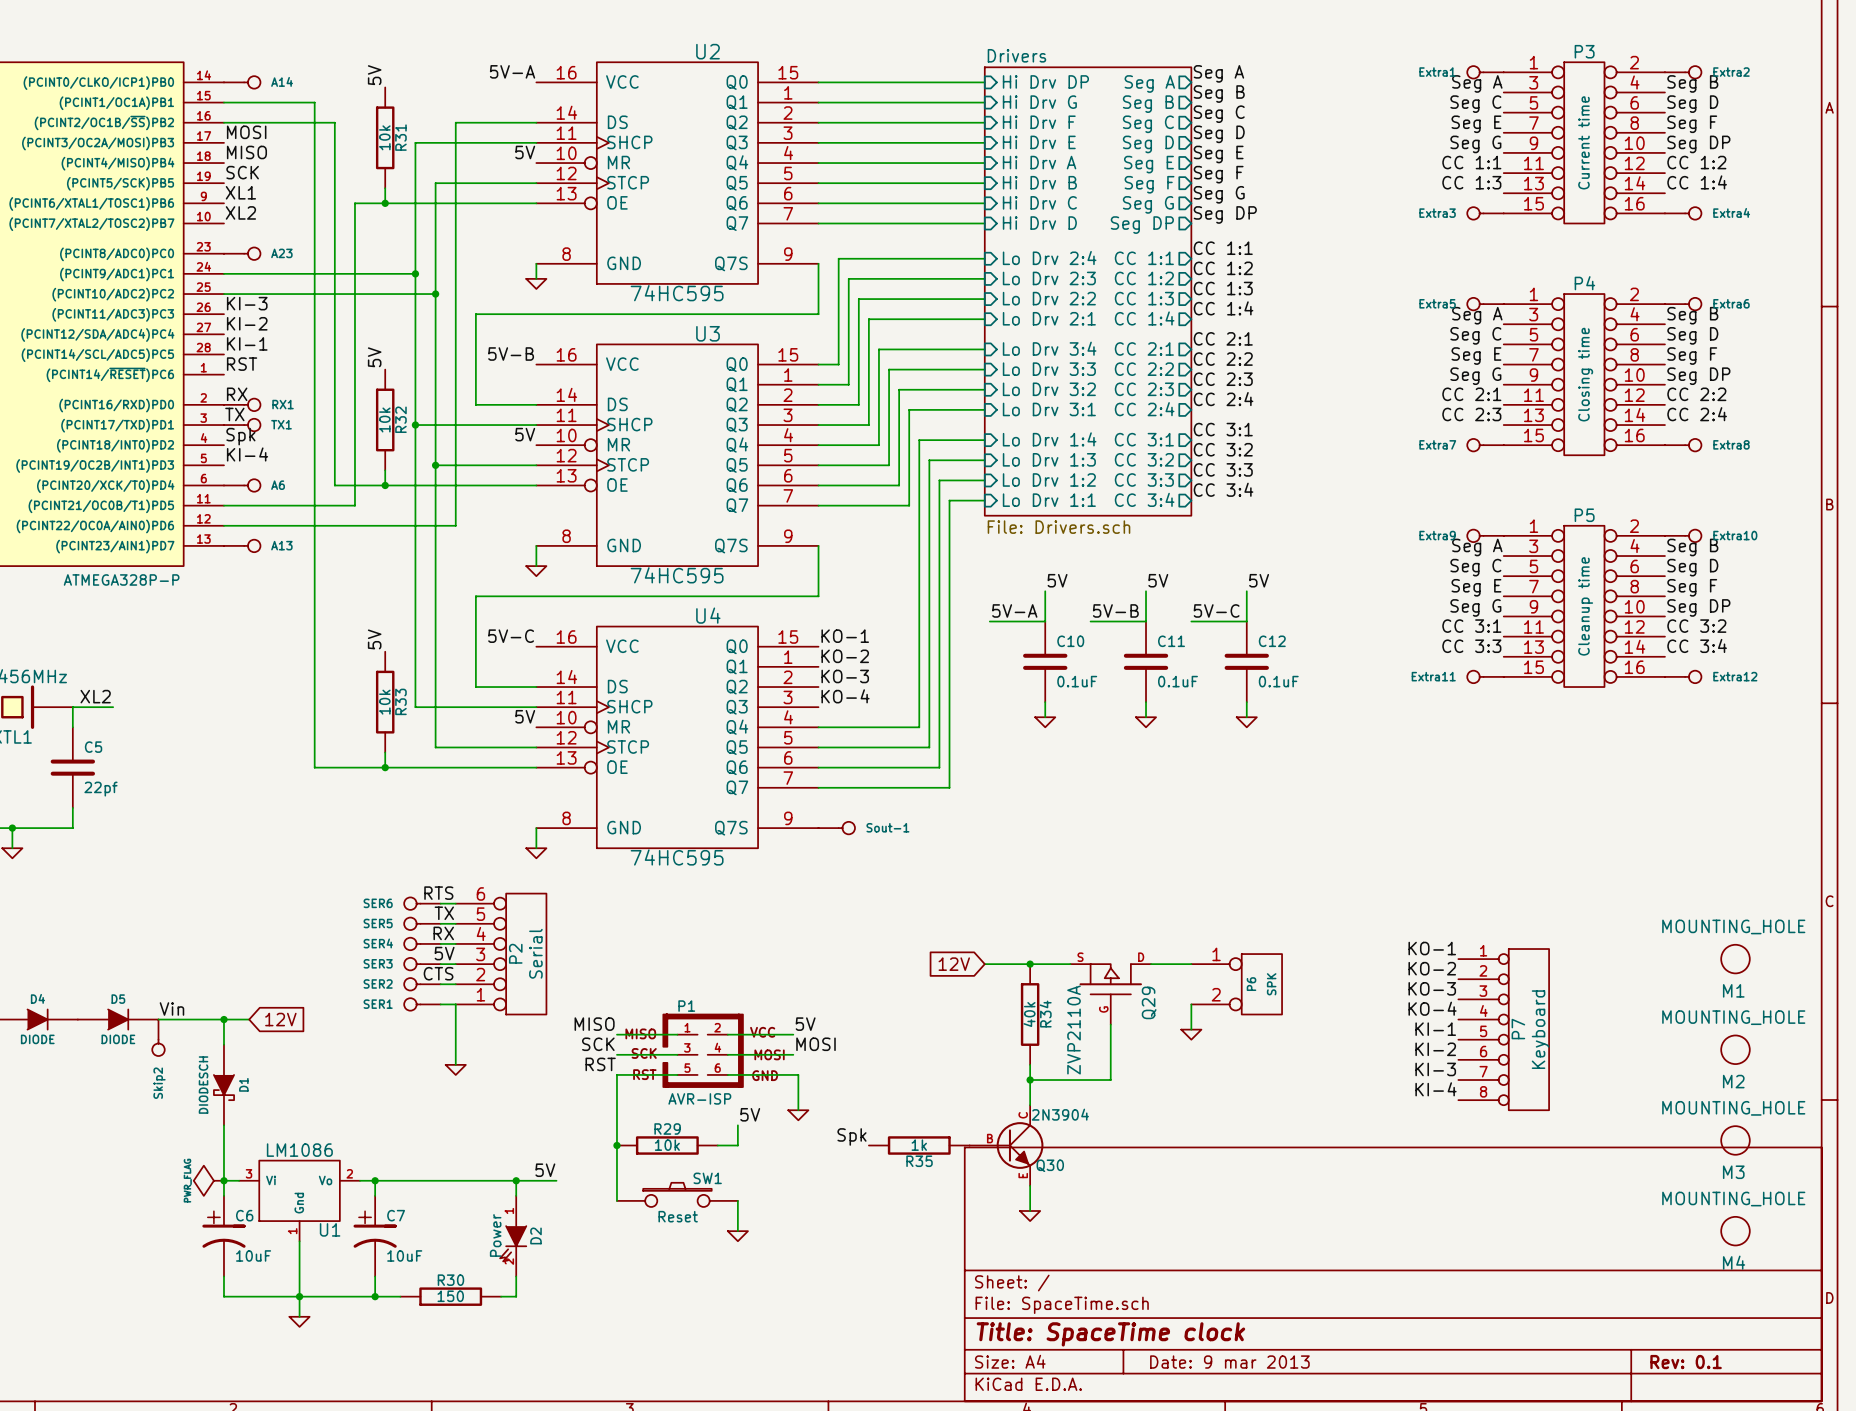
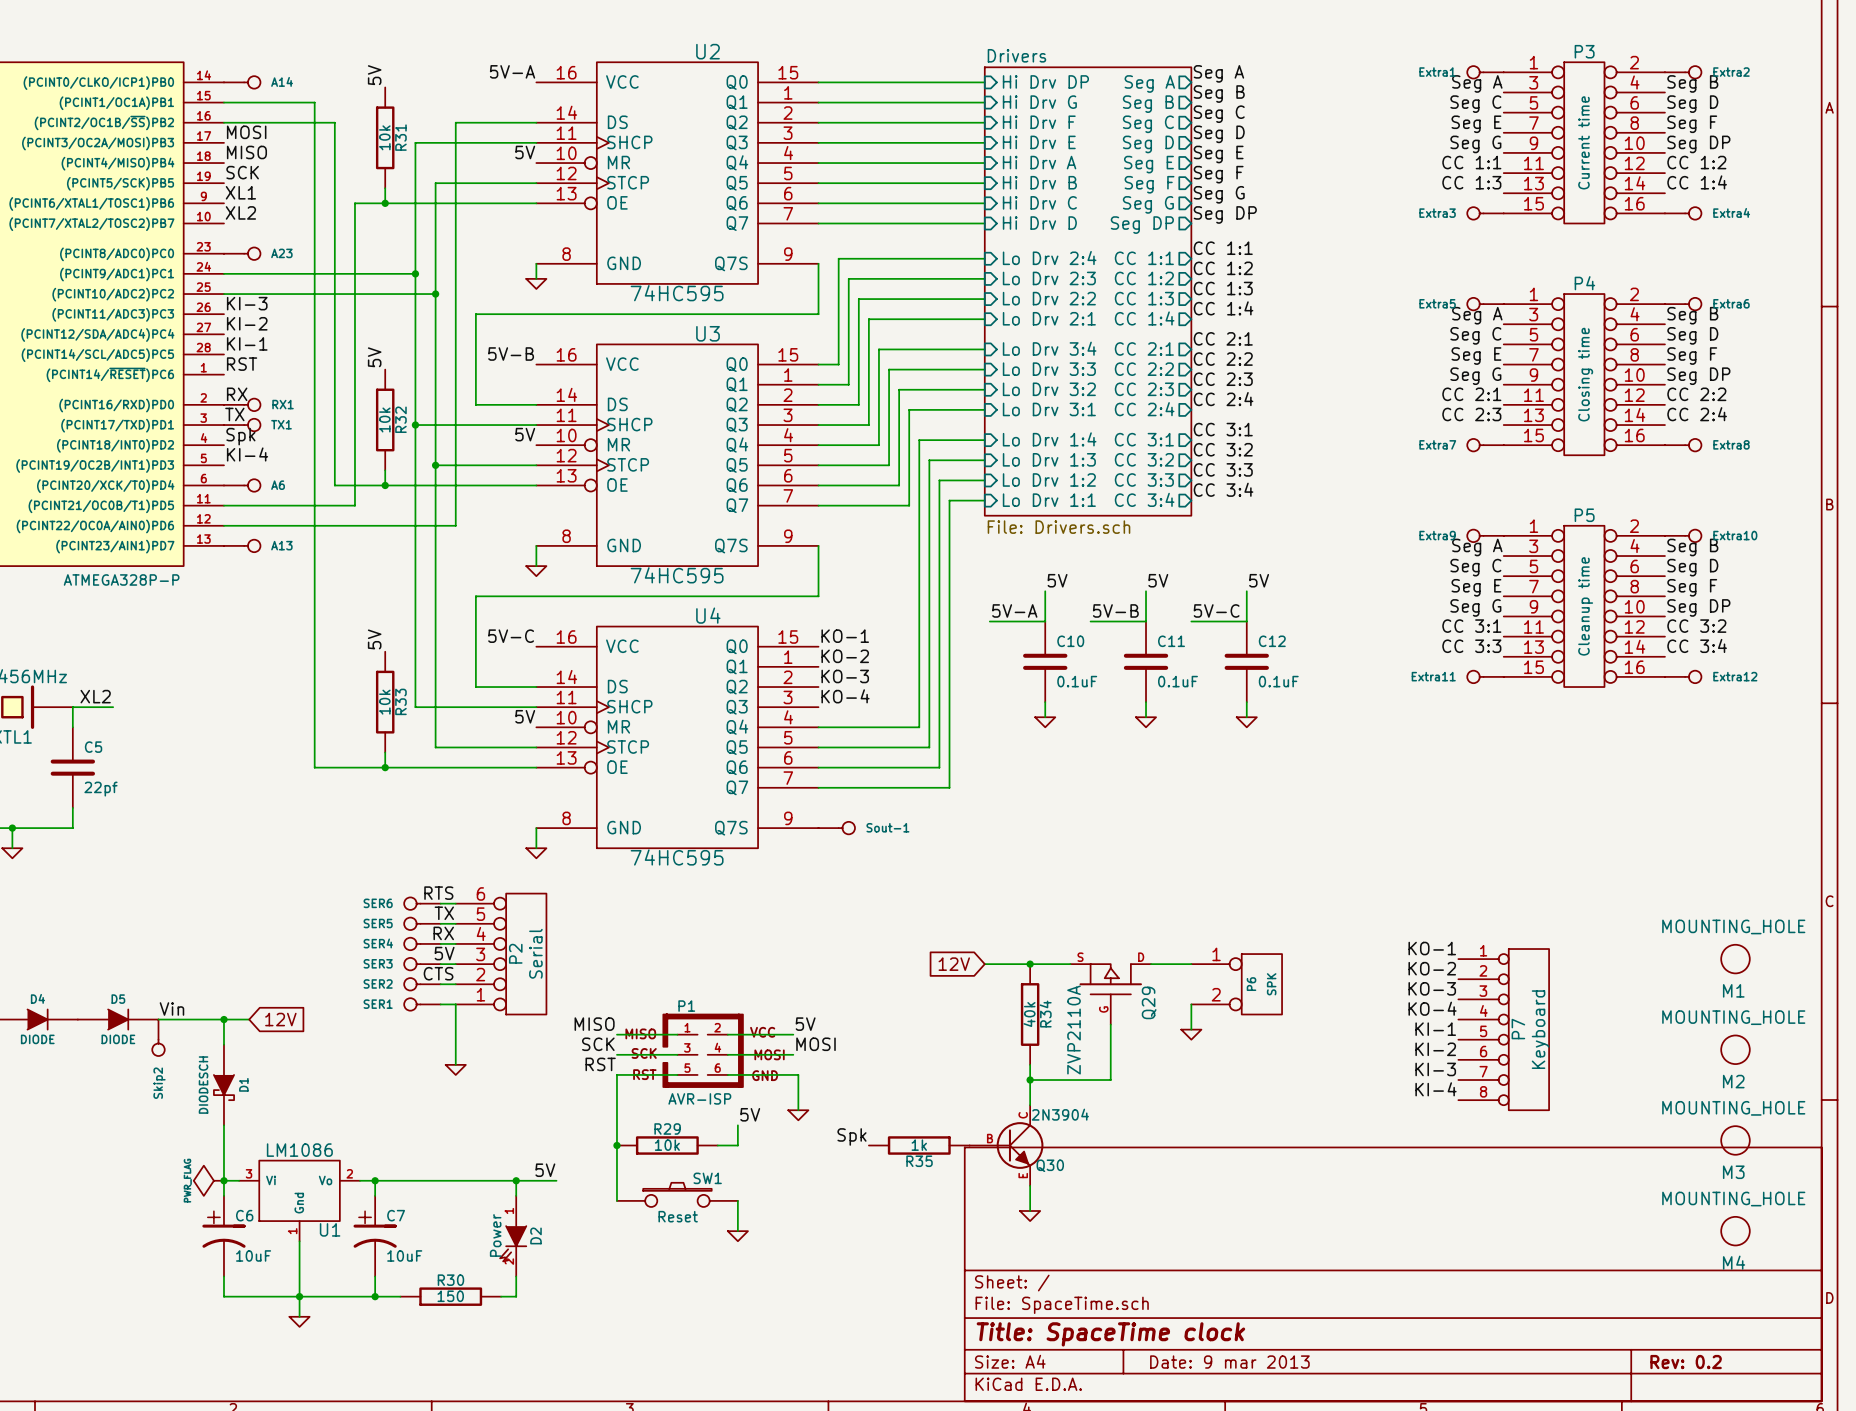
title block: Rev: 0.1 (1686, 1362) -> Rev: 0.2 (1686, 1362)

